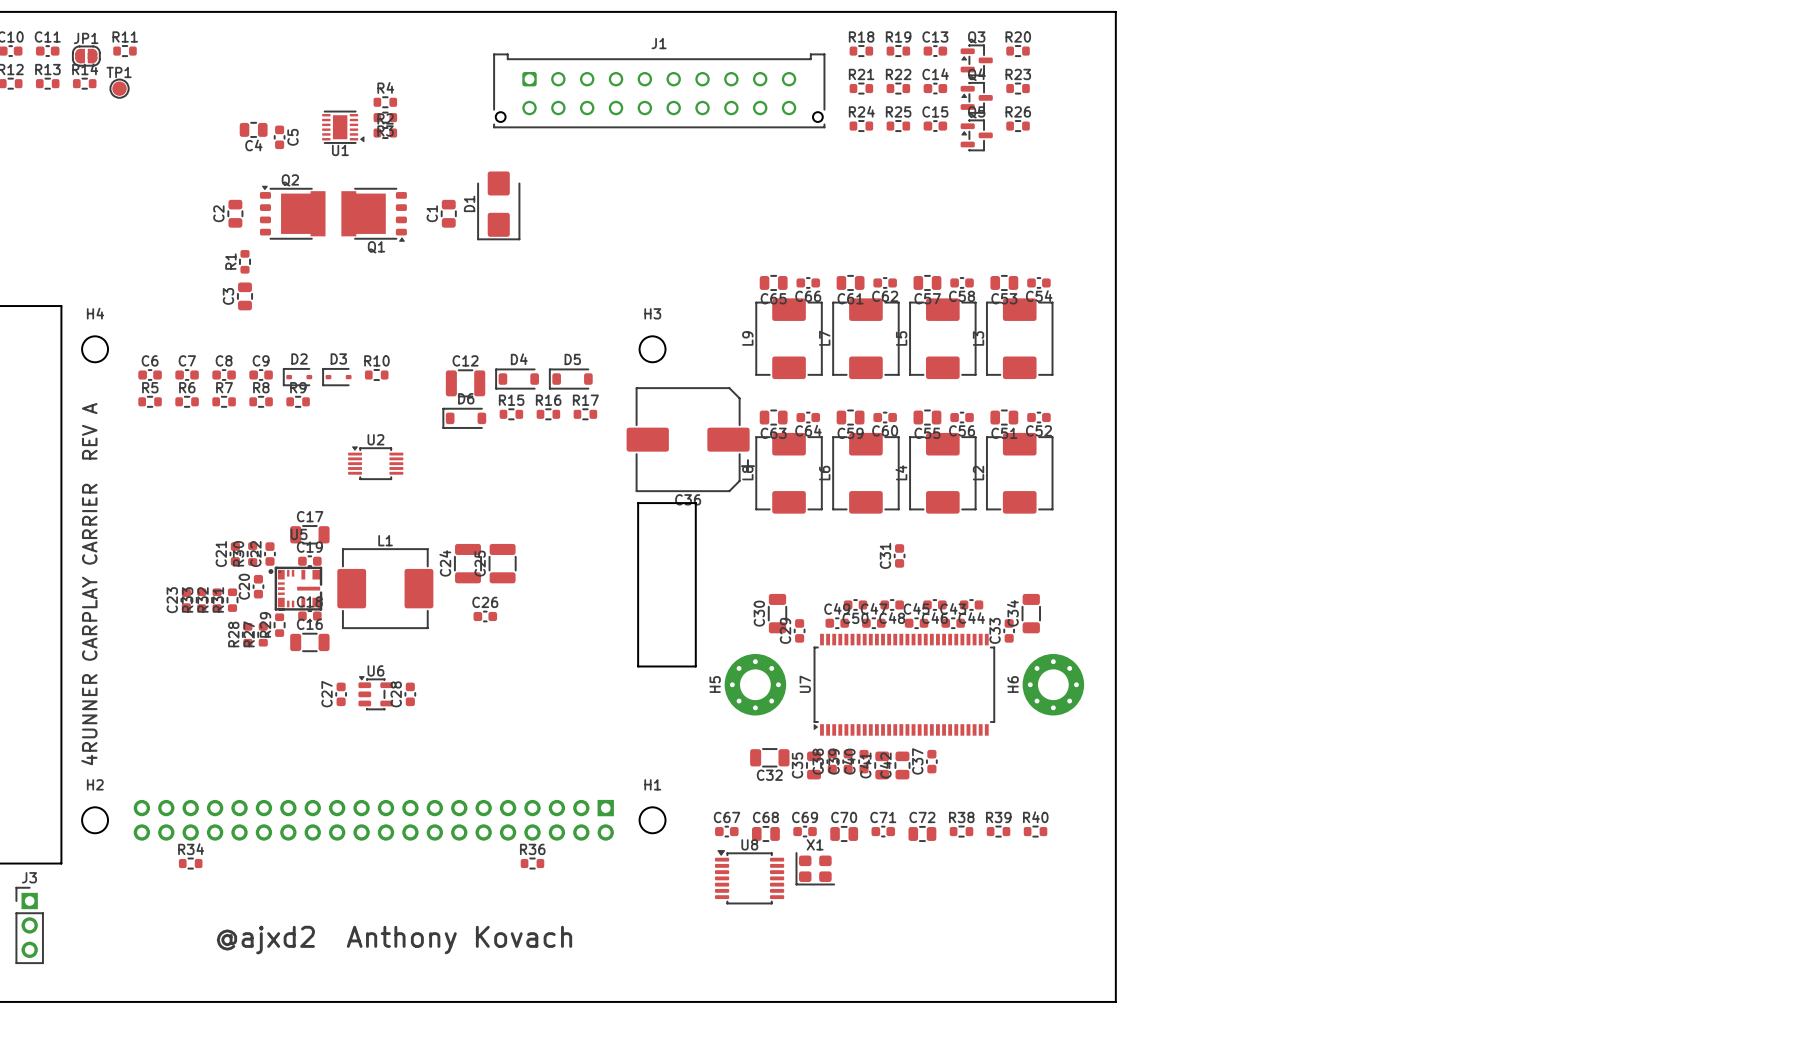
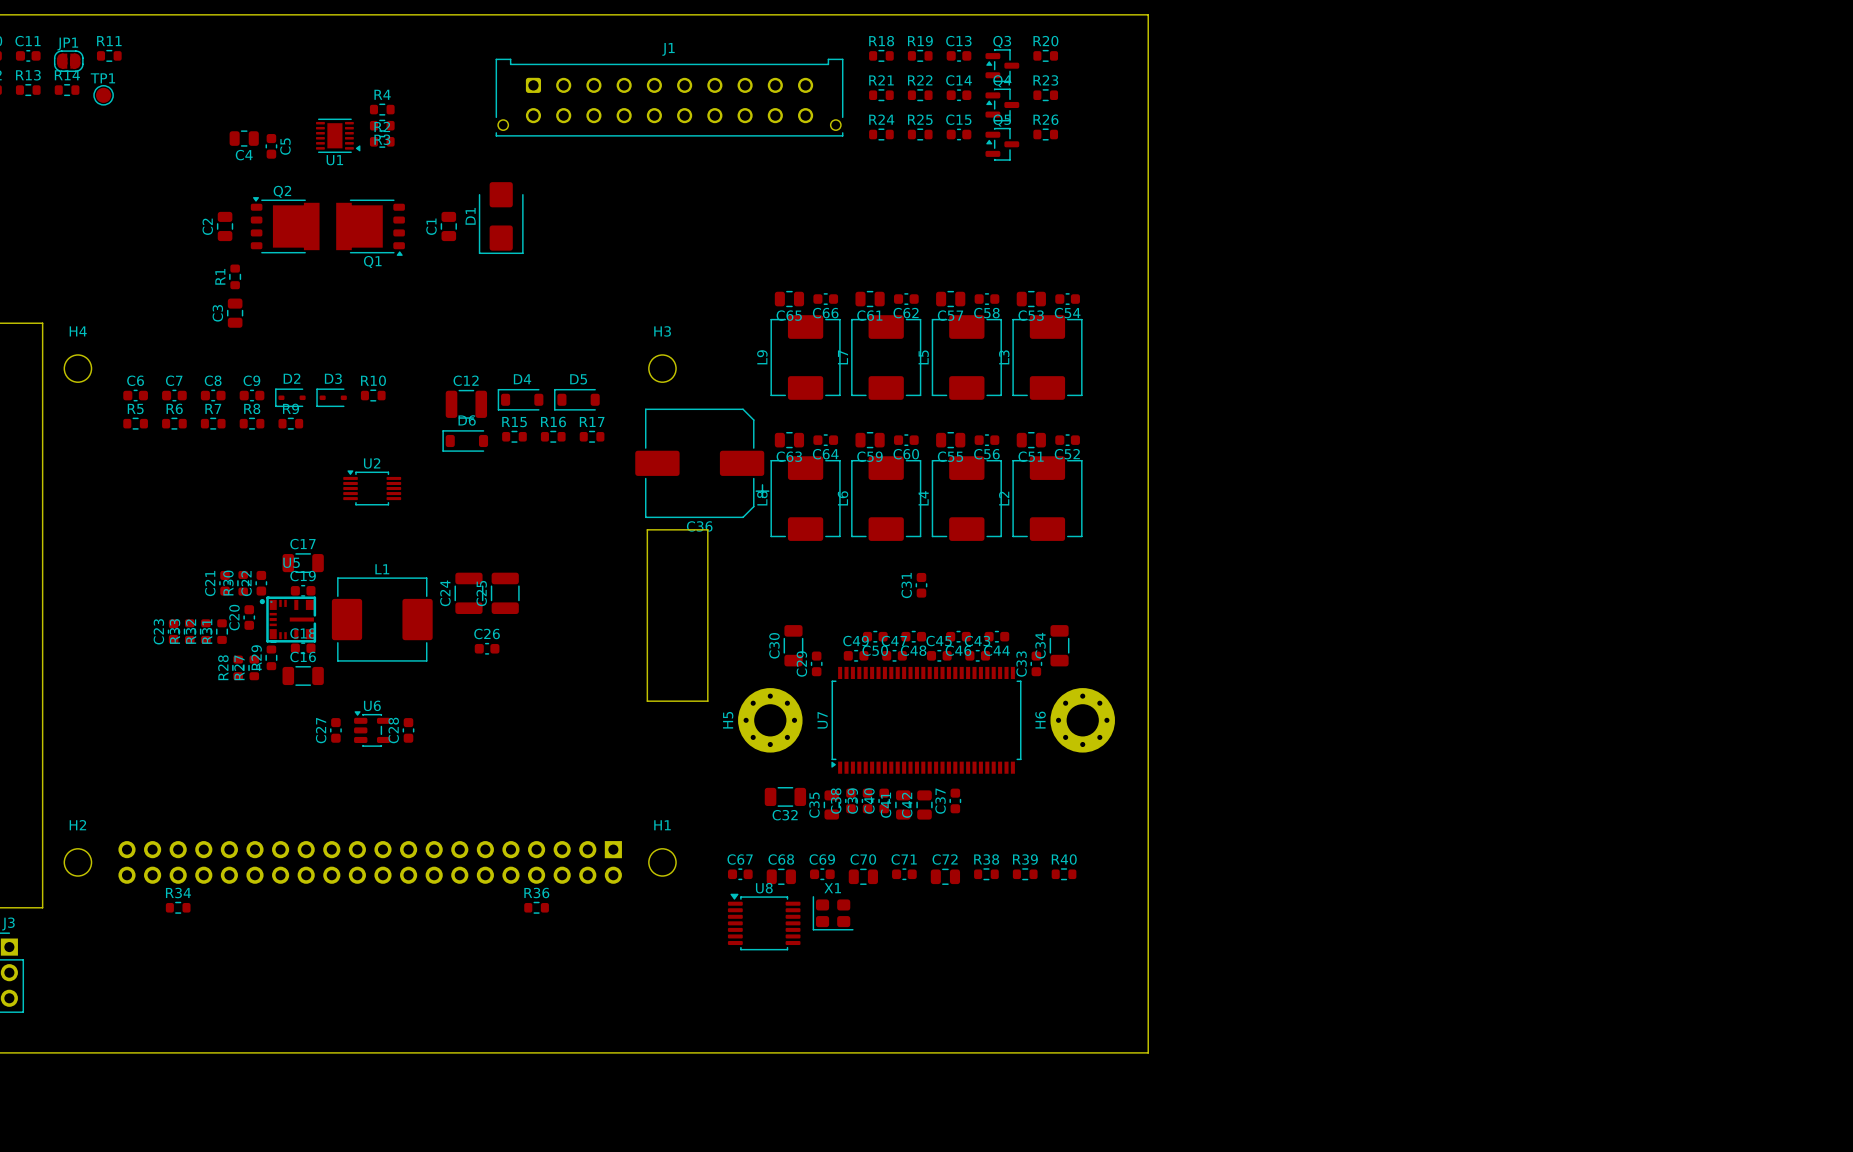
text: 4RUNNER CARPLAY CARRIER REV A (89, 584) -> none
text: @ajxd2 Anthony Kovach (394, 940) -> none

